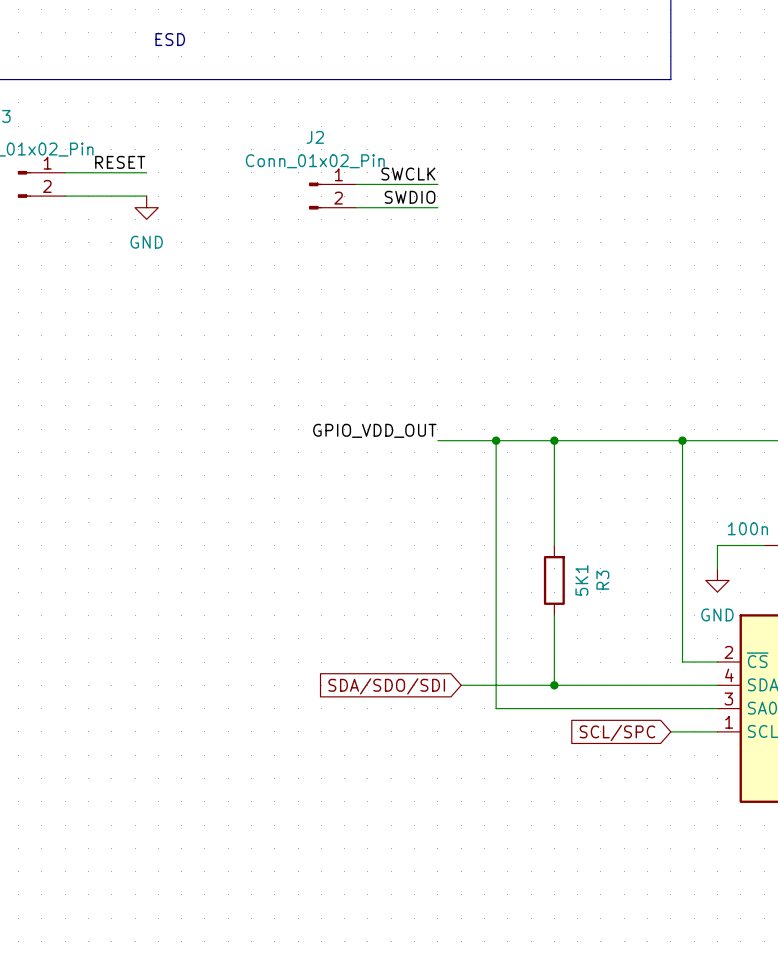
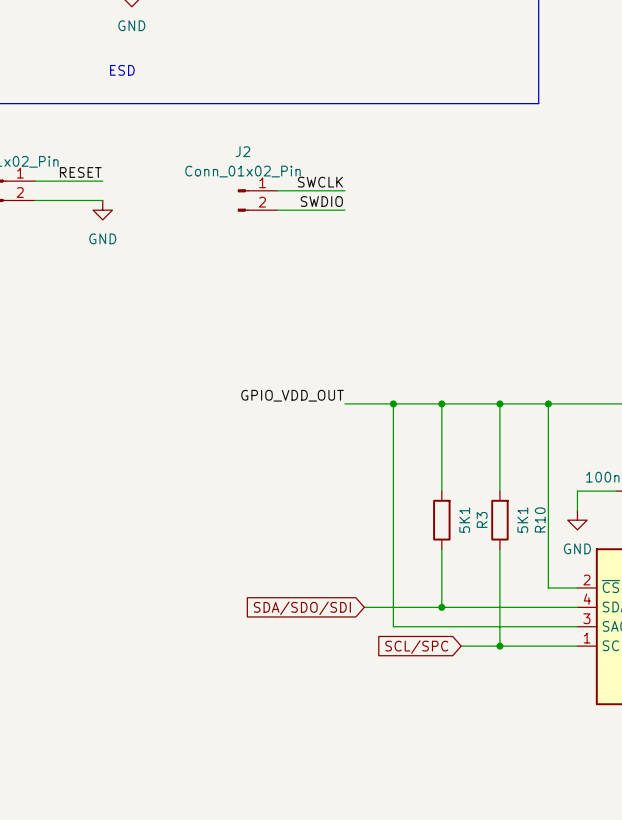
wire: none -> (499, 403) (499, 491)
junction: none -> (499, 403)
R10: none -> 5K1 (499, 520)
wire: none -> (499, 549) (499, 646)
wire: none -> (461, 646) (538, 646)
junction: none -> (499, 646)
global label position: SCL/SPC (617, 733) -> SCL/SPC (416, 647)

